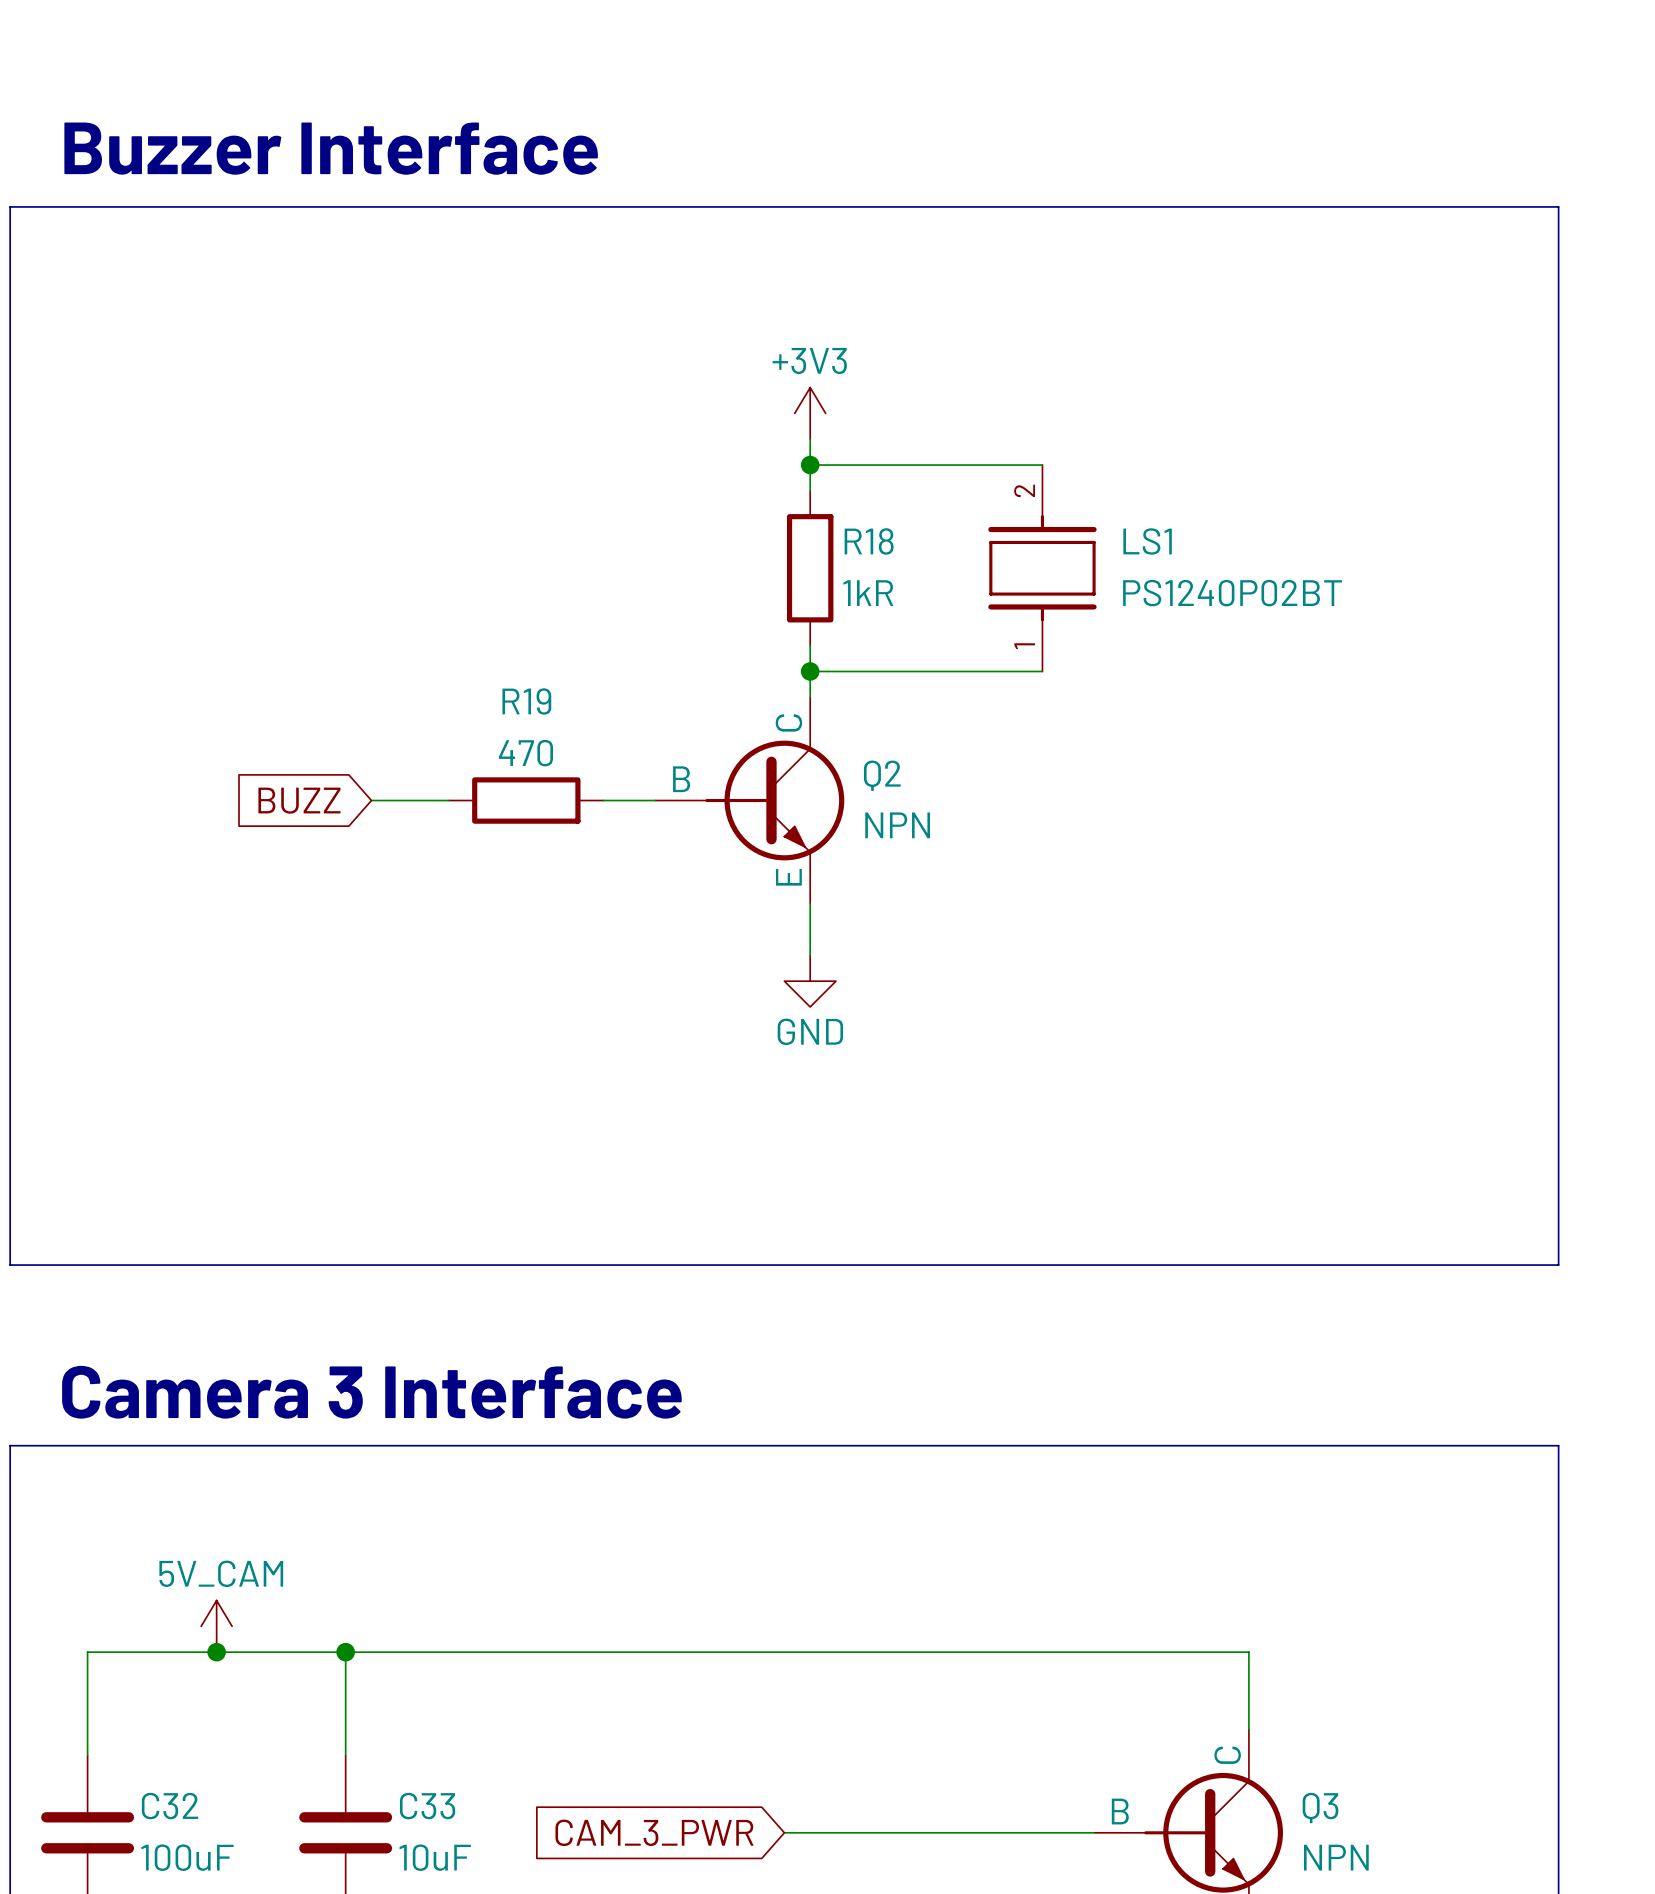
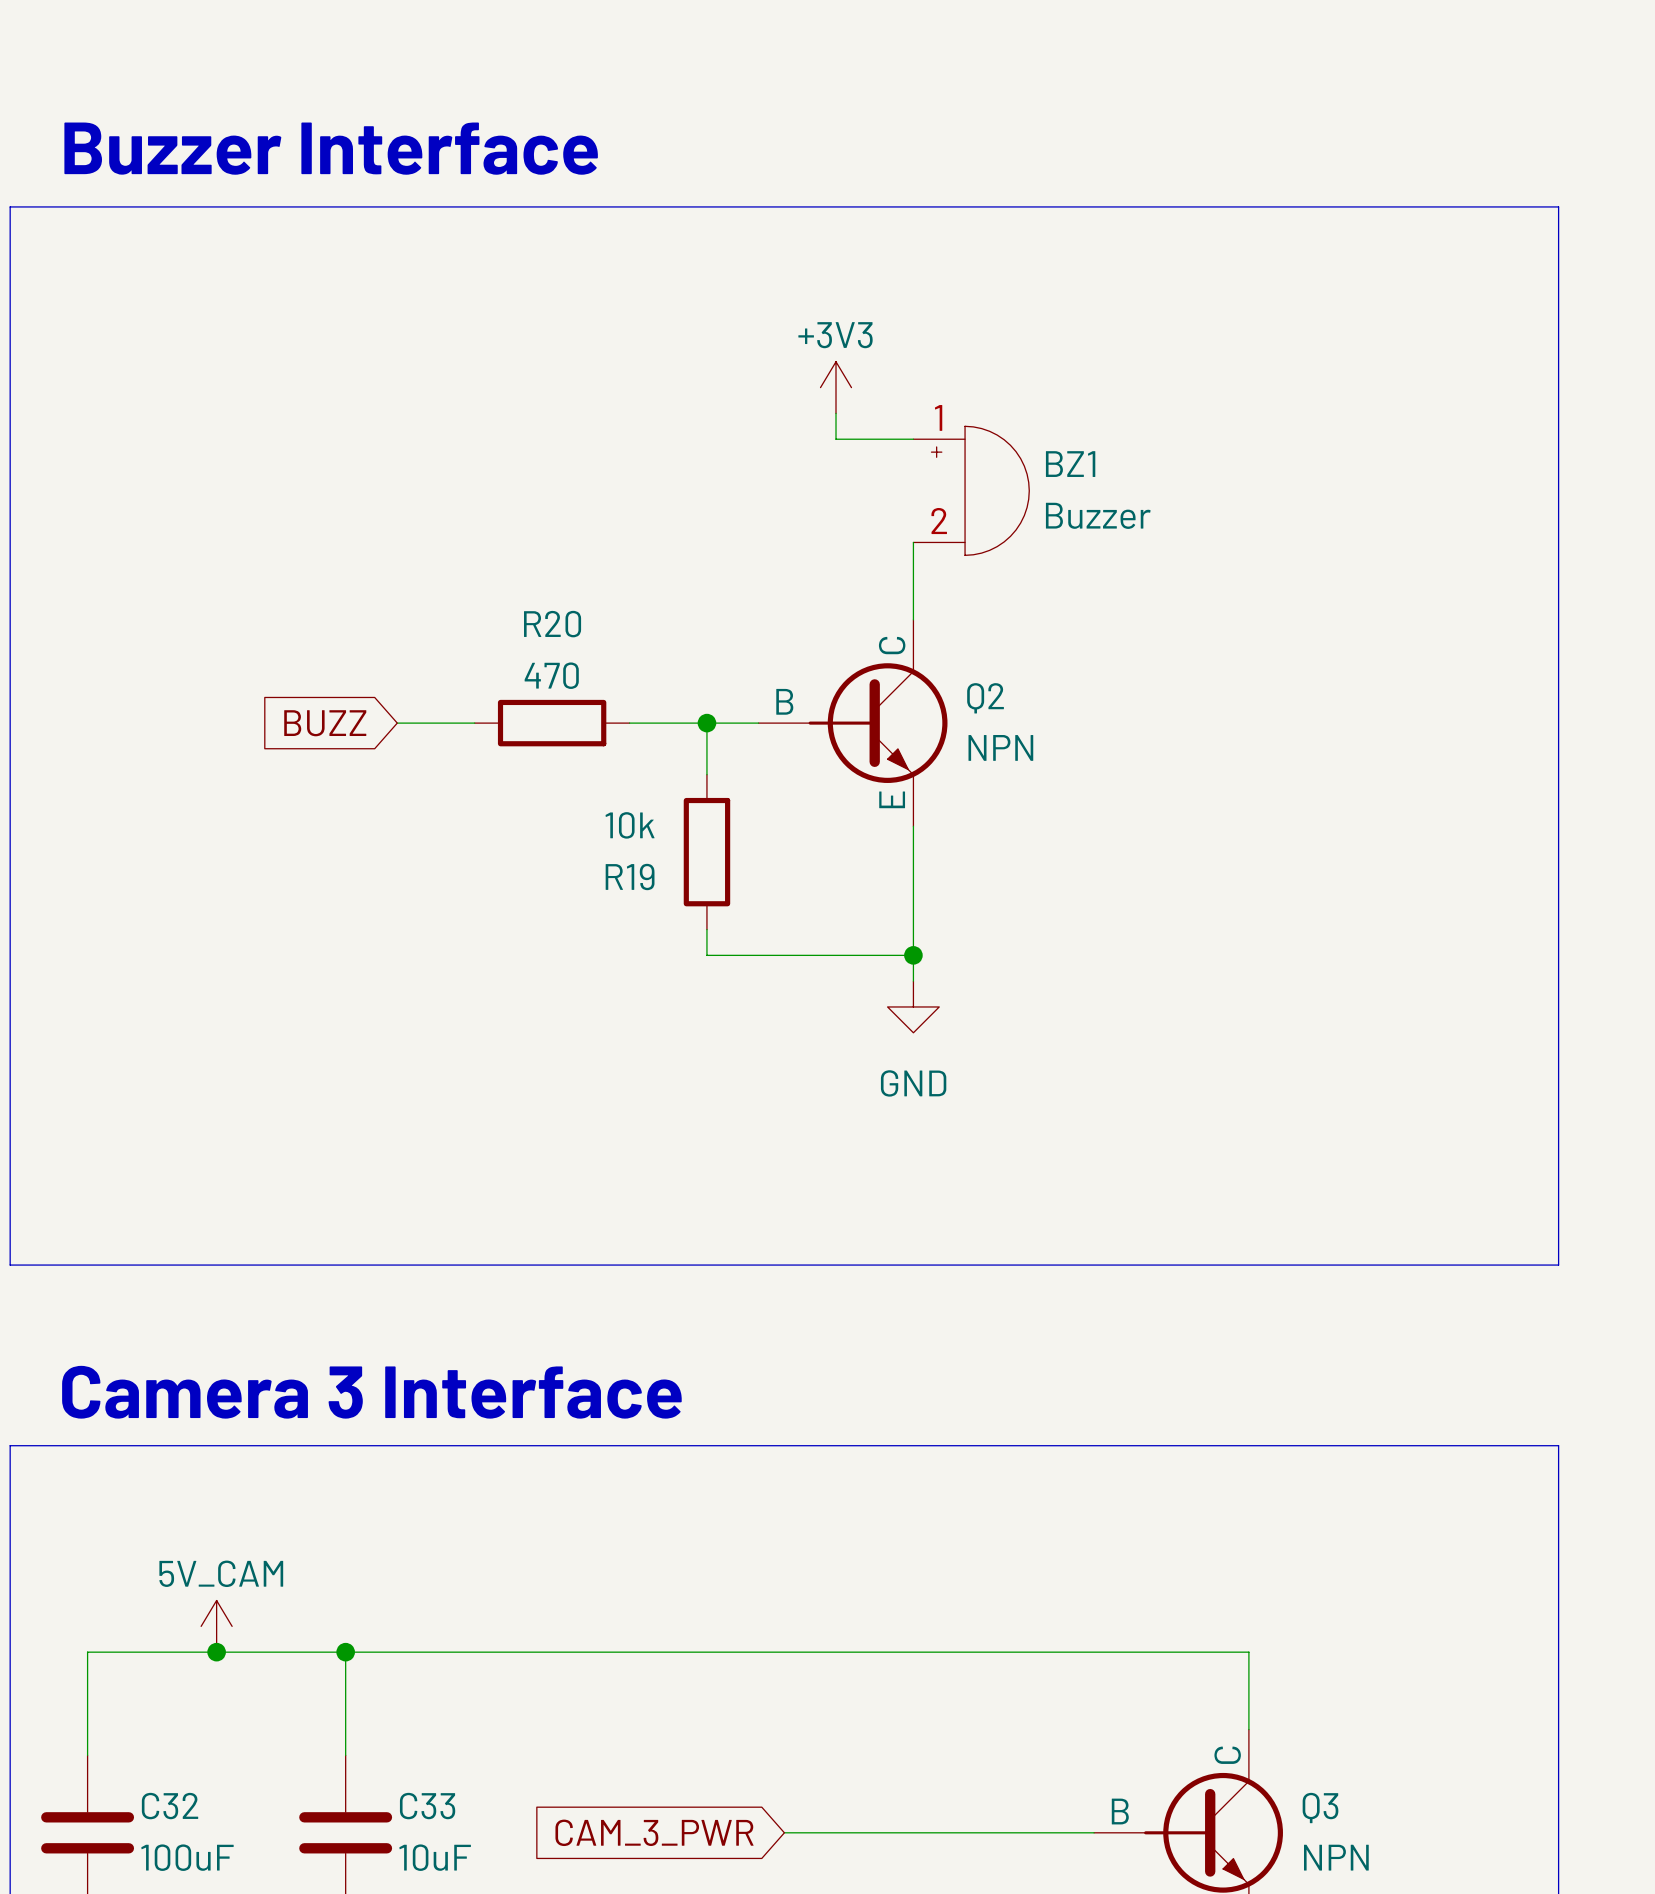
power symbol position: +3V3 (810, 413) -> +3V3 (836, 387)
wire: none -> (836, 413) (836, 439) (913, 439)
wire: (810, 439) (810, 490) -> none
wire: (810, 465) (1042, 465) -> none
junction: (810, 465) -> none
BZ1: none -> Buzzer (971, 490)
wire: none -> (913, 542) (913, 619)
R18: 1kR (810, 568) -> none
LS1: PS1240P02BT (1042, 568) -> none
wire: (810, 645) (810, 697) -> (706, 723) (706, 774)
wire: (810, 671) (1042, 671) -> none
junction position: (810, 671) -> (706, 723)
R19 name position: R19 (526, 701) -> R19 (630, 877)
R20: none -> 470 (552, 723)
wire: none -> (629, 723) (758, 723)
R19 value: 470 (525, 753) -> 10k (630, 825)
global label position: BUZZ (299, 800) -> BUZZ (325, 723)
wire: (371, 800) (448, 800) -> (397, 723) (474, 723)
R19 rotation: 0° (526, 800) -> 90° clockwise (706, 852)
R19 position: (526, 800) -> (706, 852)
wire: (603, 800) (655, 800) -> none
Q2 position: (749, 800) -> (853, 723)
wire: none -> (913, 826) (913, 981)
wire: (810, 903) (810, 955) -> none
wire: none -> (706, 929) (706, 955) (913, 955)
junction: none -> (913, 955)
power symbol position: GND (810, 981) -> GND (913, 1006)
power symbol text position: GND (810, 1031) -> GND (913, 1083)

